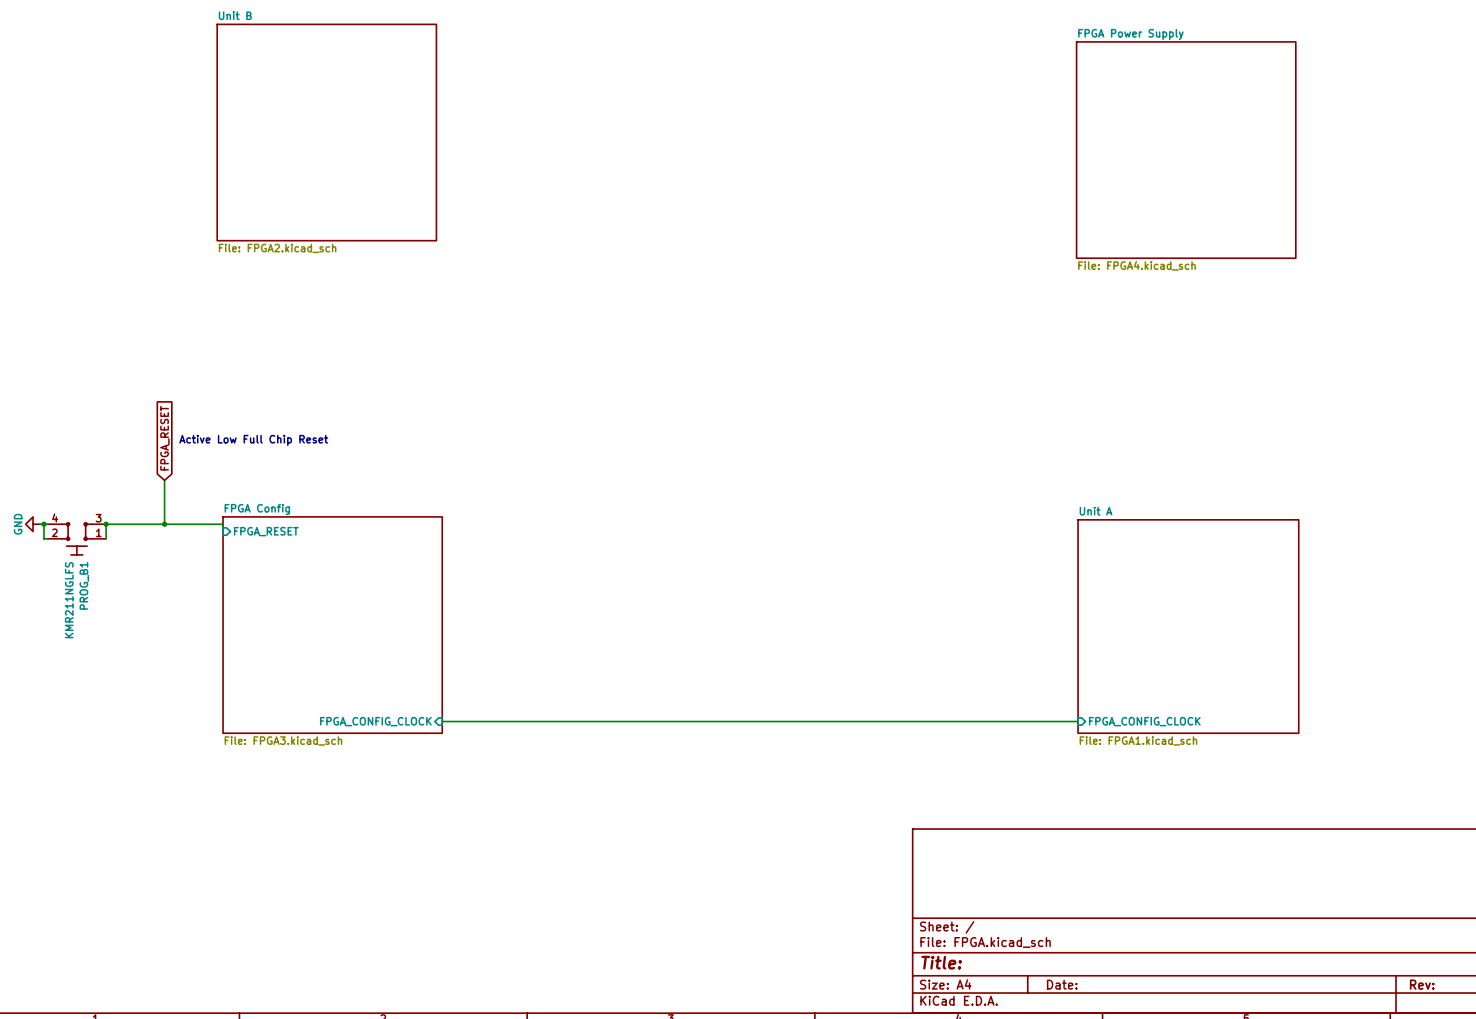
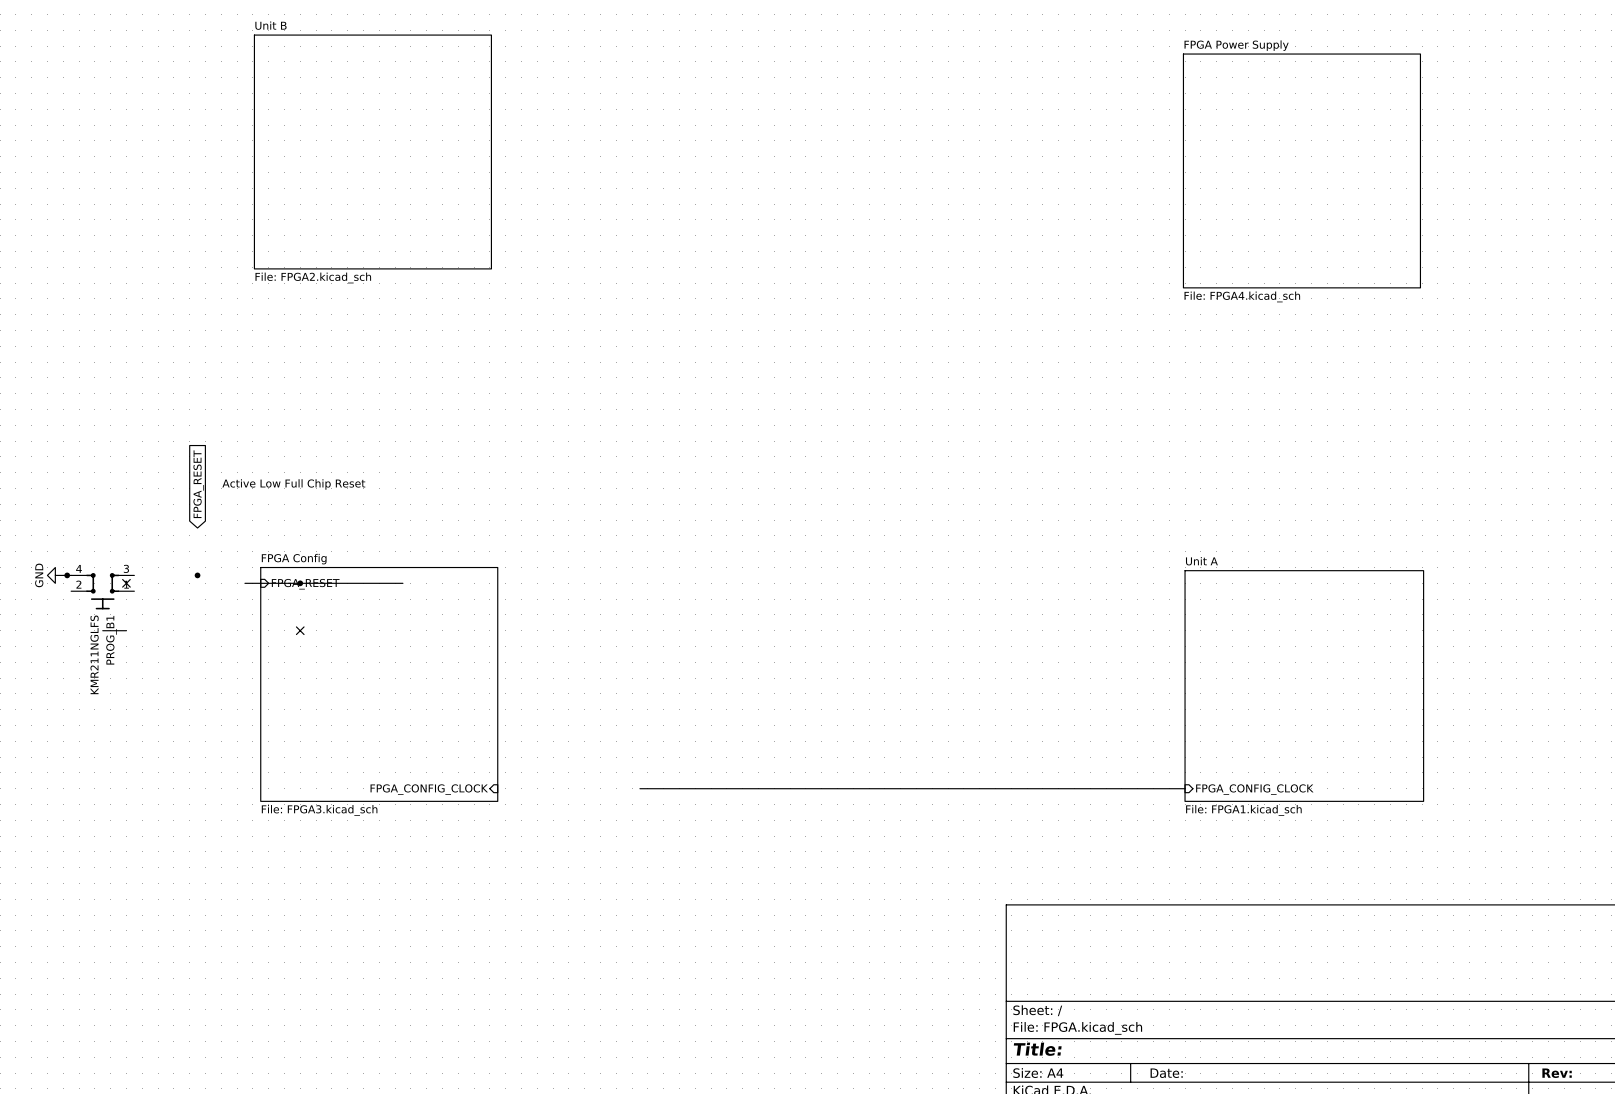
wire: (164, 480) (164, 524) -> none
wire: (43, 524) (43, 538) (47, 538) -> none
junction: (106, 524) -> none
no-connect mark: none -> (126, 583)
wire: none -> (244, 583) (402, 583)
wire: (223, 531) (223, 524) (106, 524) (106, 538) -> none
junction: none -> (300, 583)
wire: none -> (102, 630) (126, 630)
no-connect mark: none -> (300, 630)
wire: (442, 721) (573, 721) -> none

